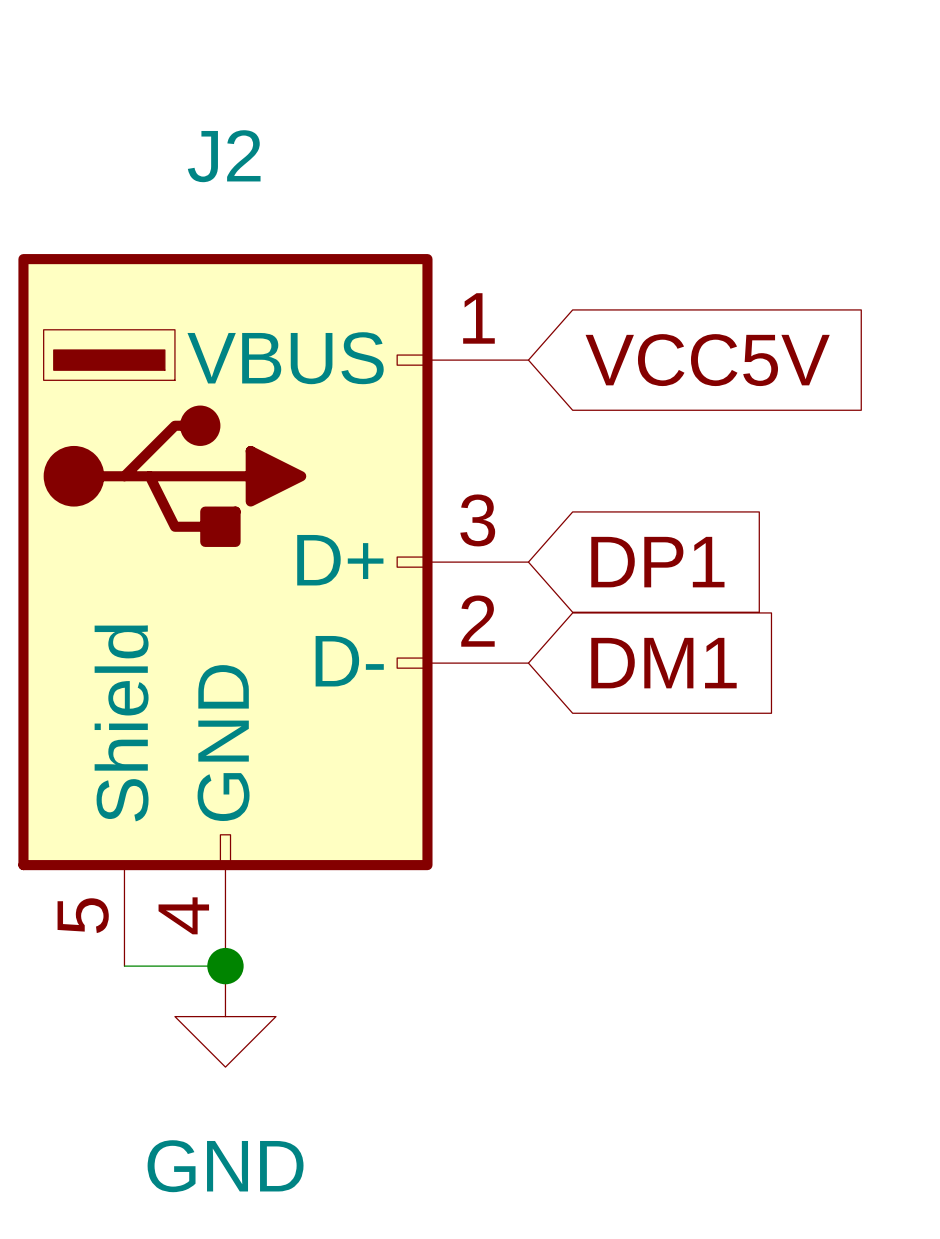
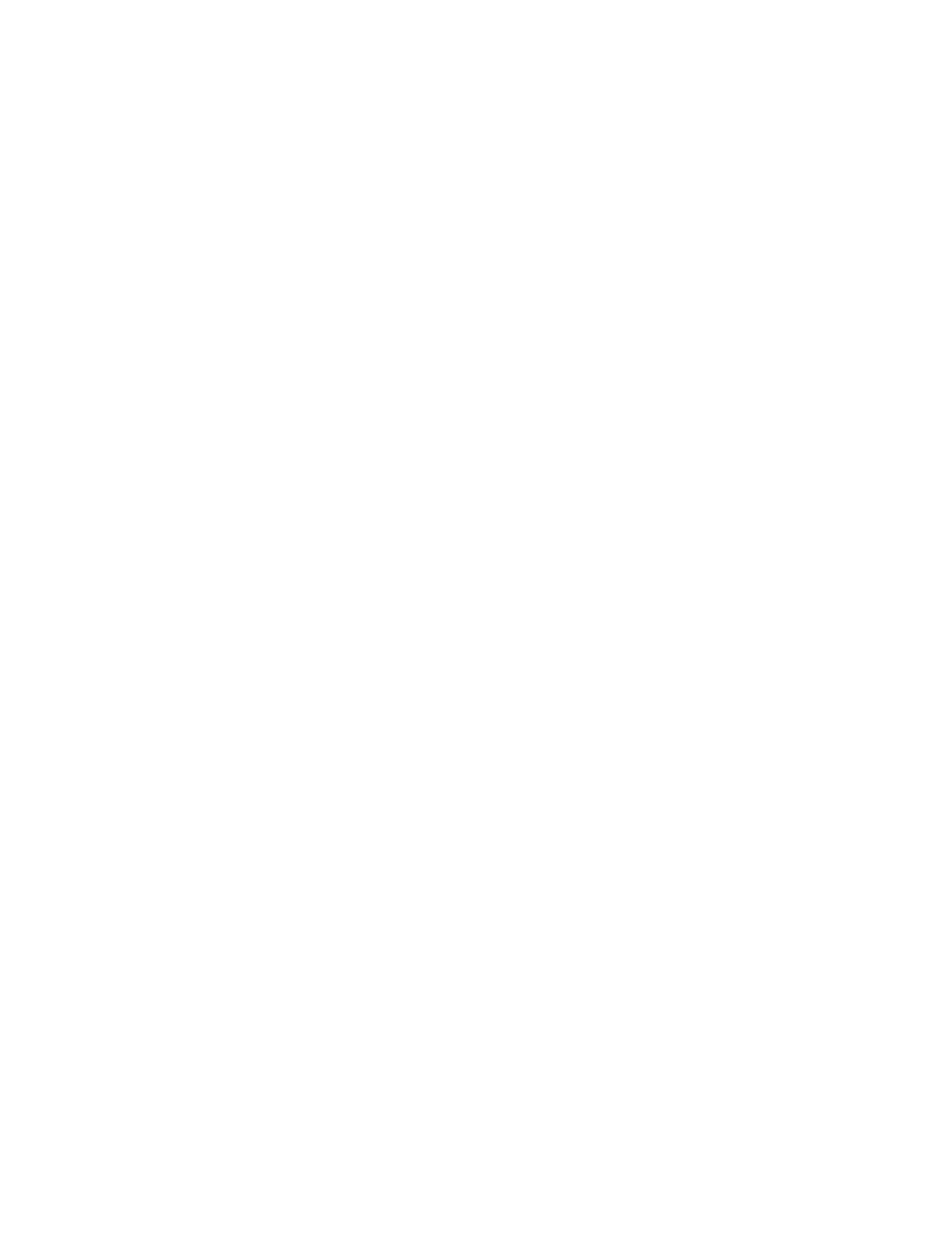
global label: VCC5V (707, 360) -> none
global label: DP1 (657, 562) -> none
J2: (273, 610) -> none
global label: DM1 (663, 663) -> none
wire: (124, 966) (225, 966) -> none
junction: (225, 966) -> none
power symbol: GND (225, 1016) -> none

